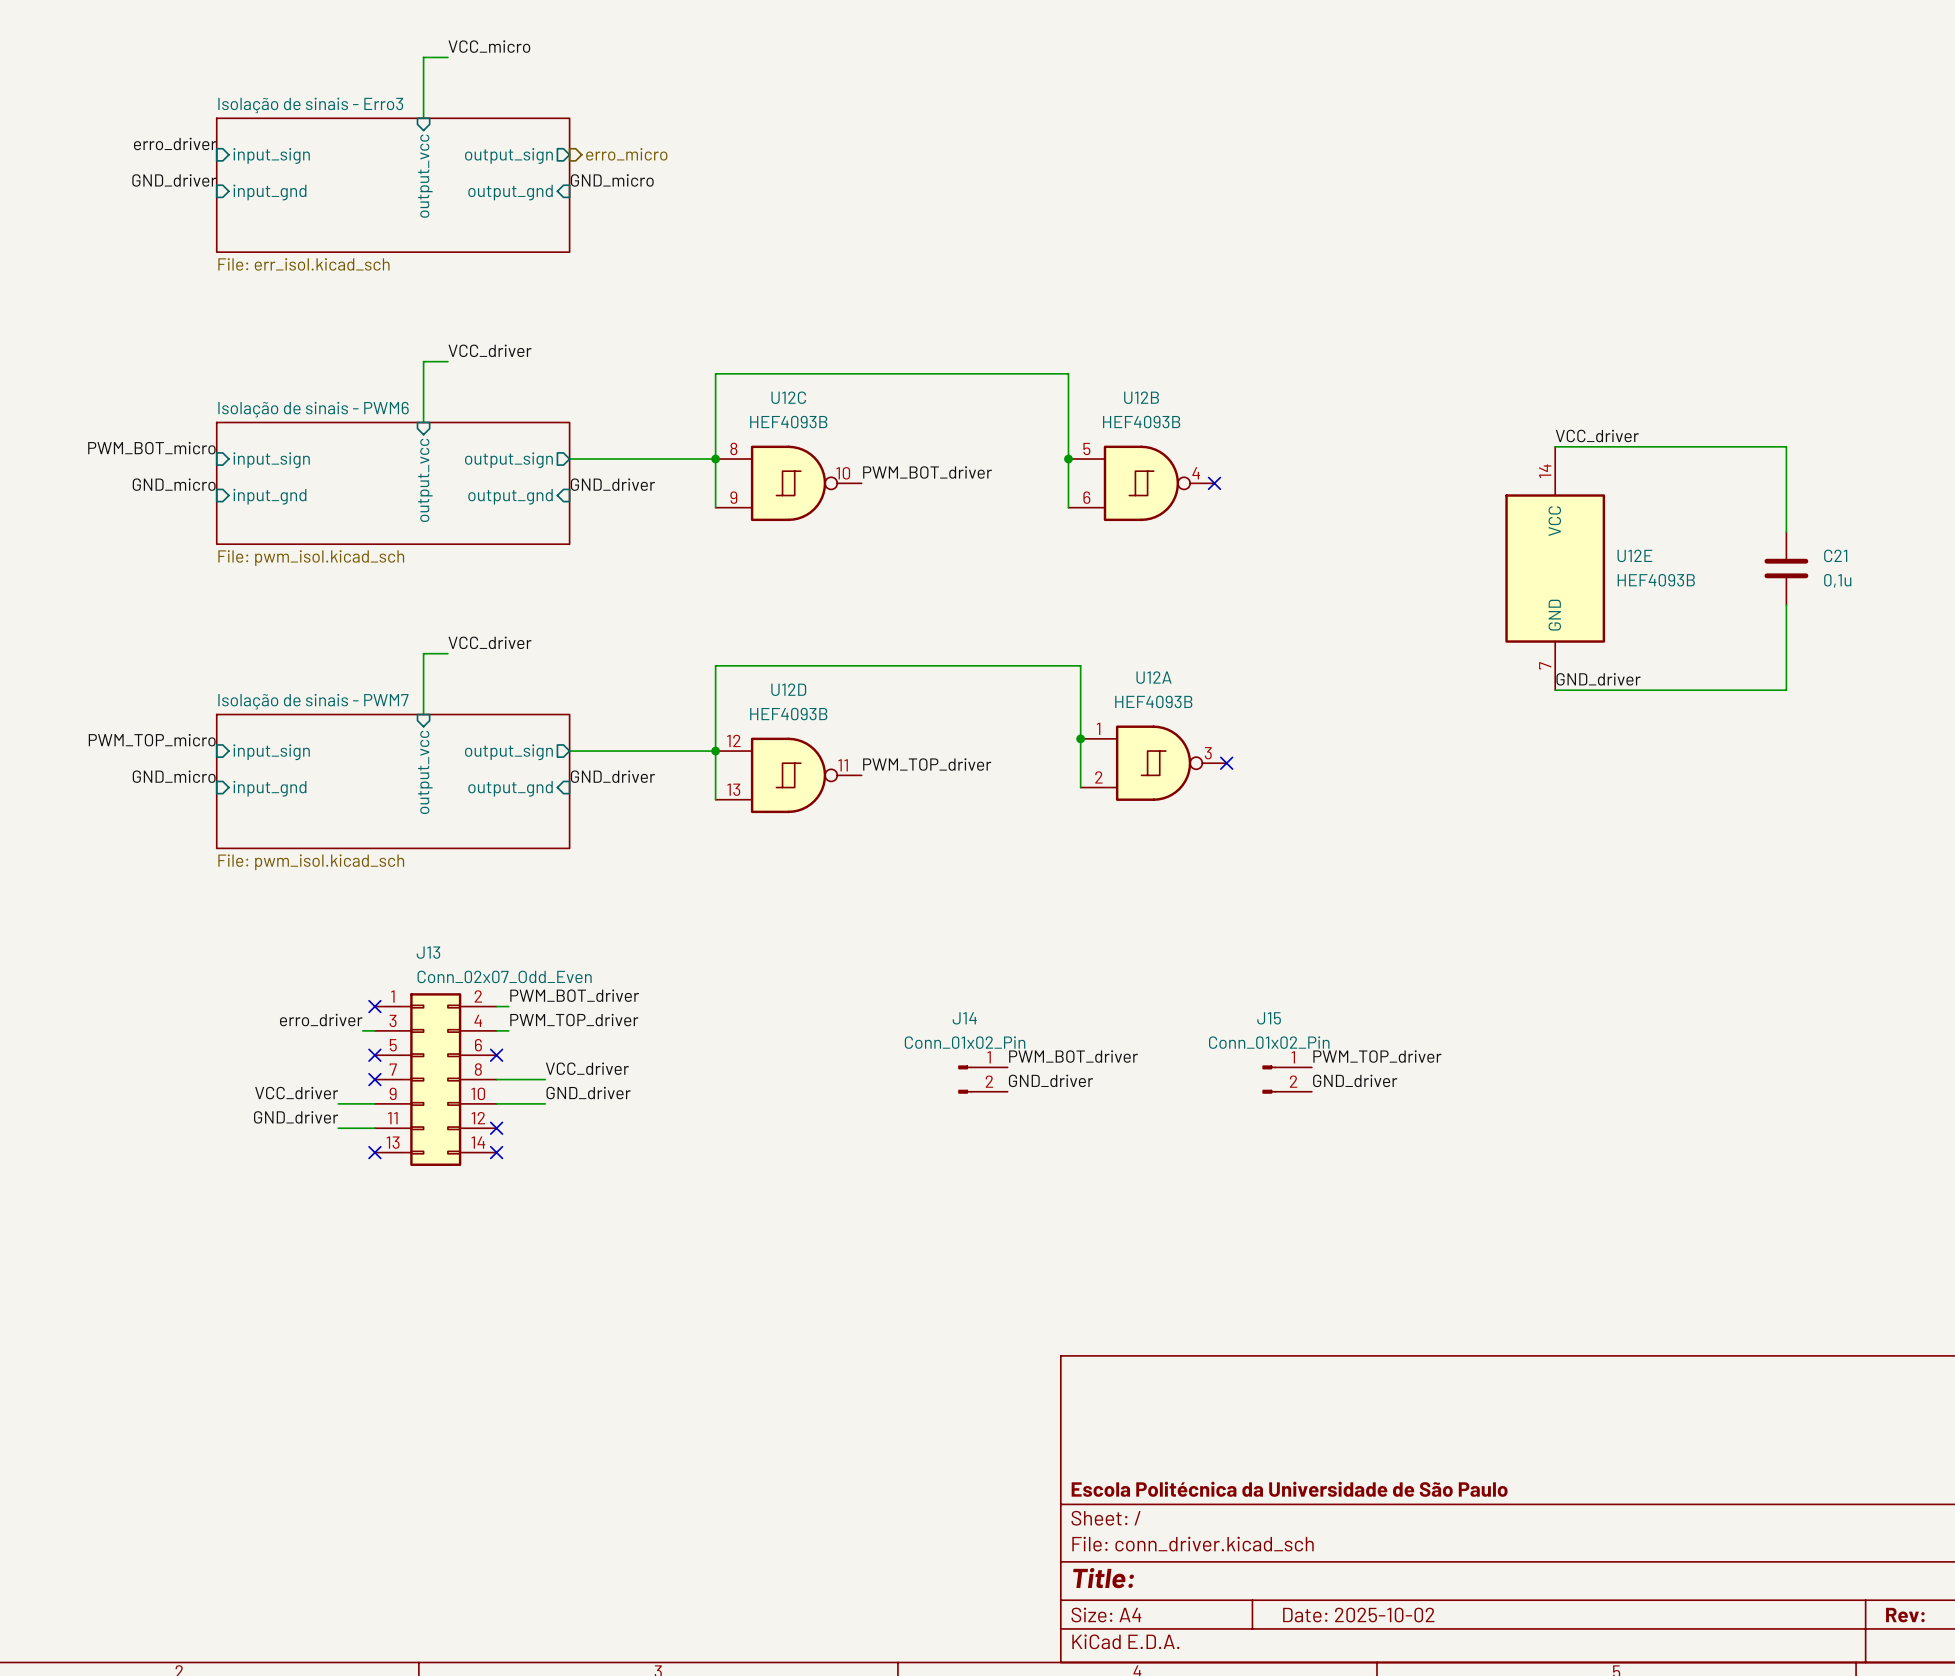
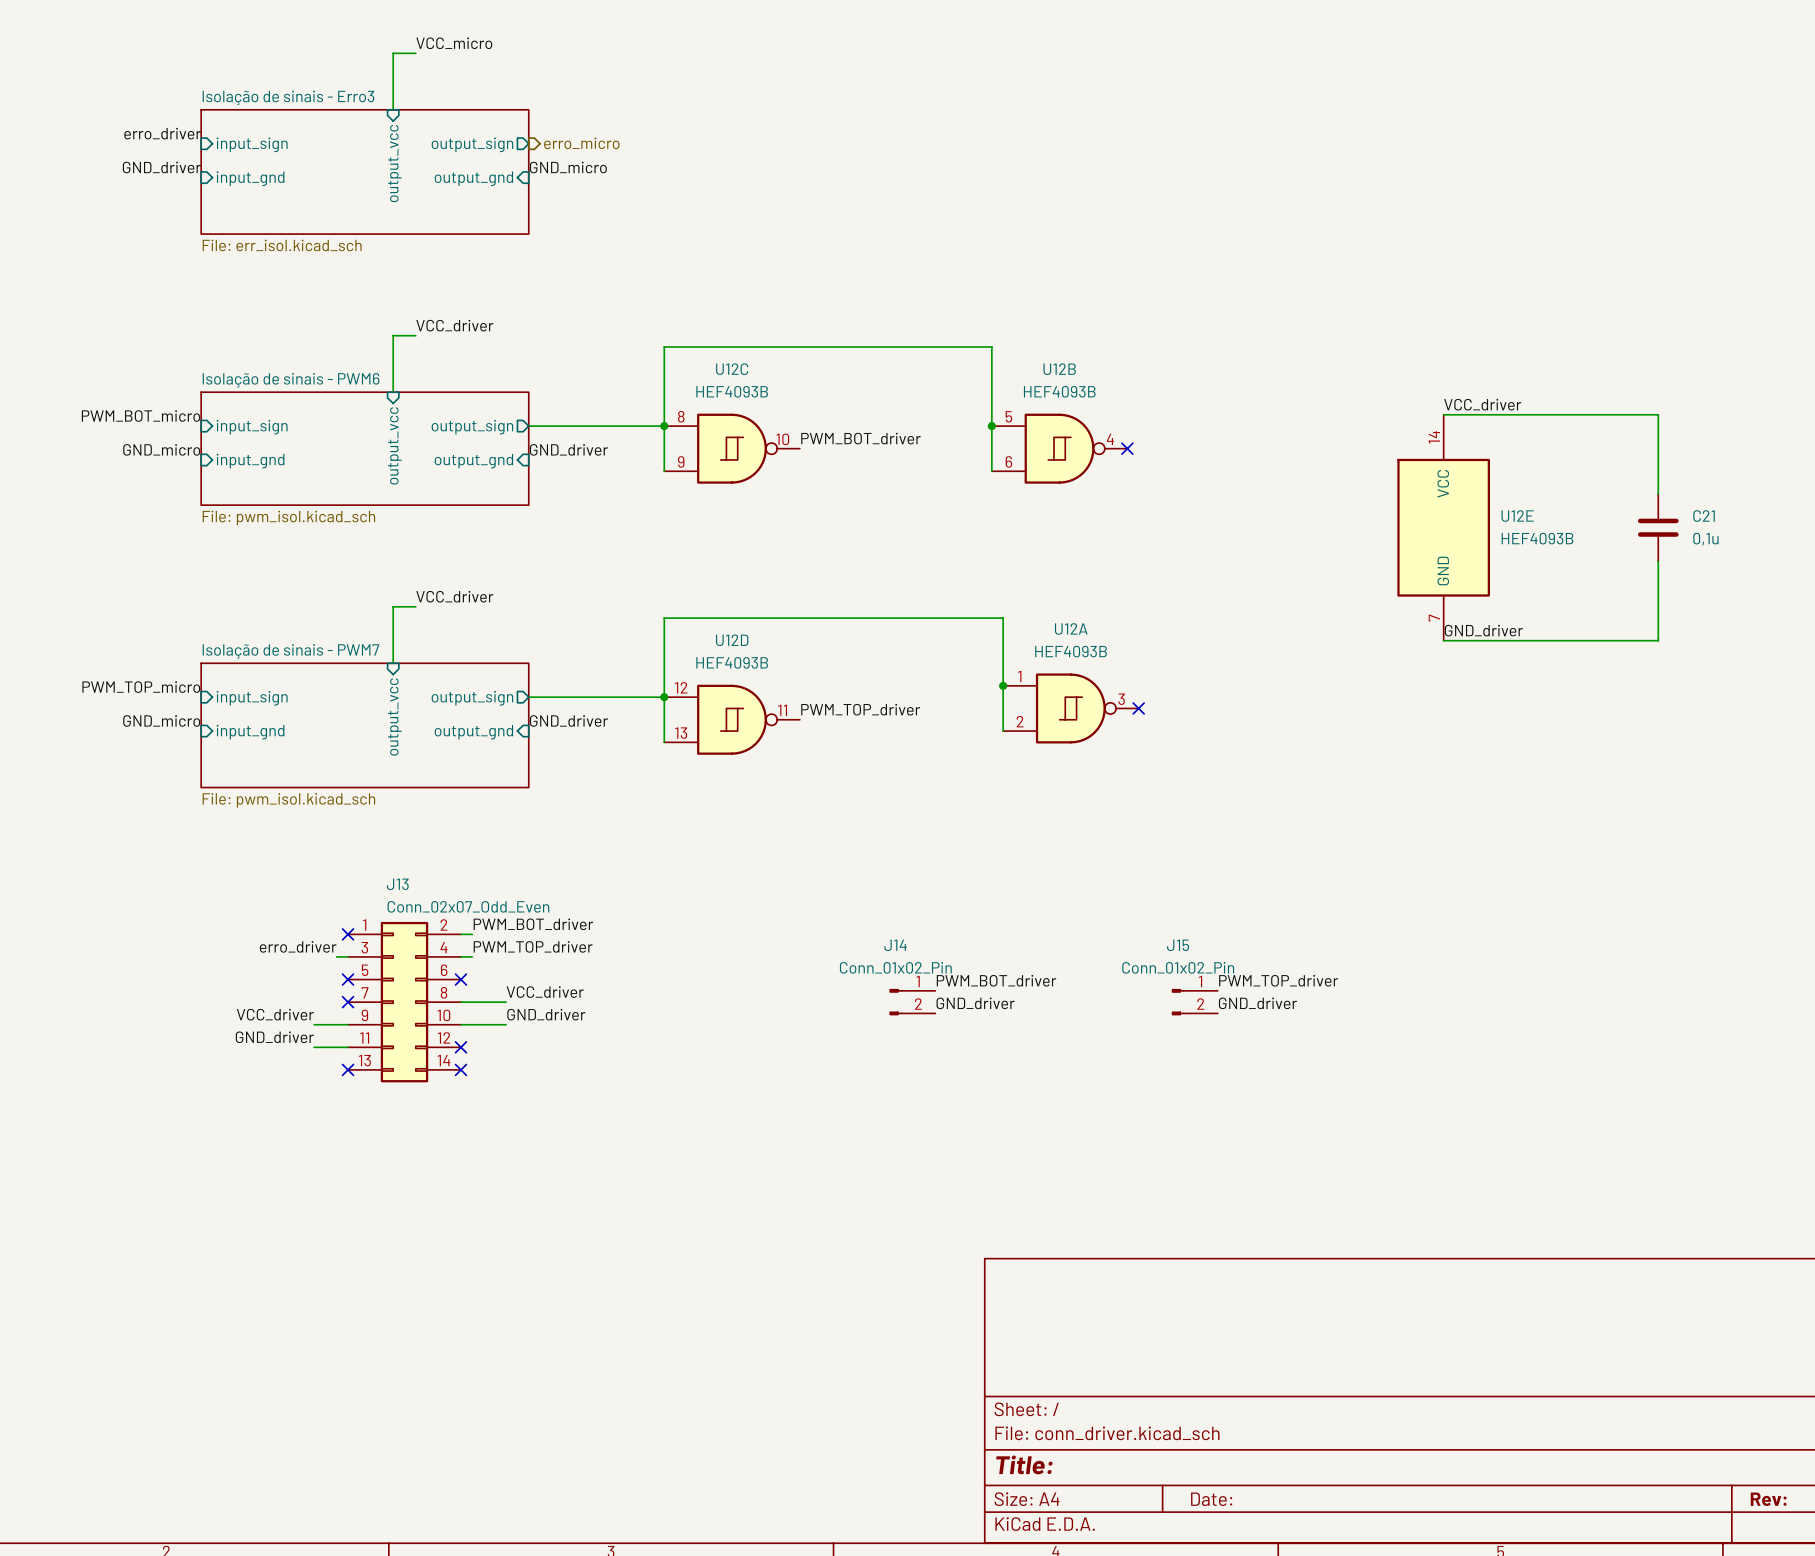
title block: Escola Politécnica da Universidade de São Paulo (1289, 1489) -> none
title block: Date: 2025-10-02 (1358, 1615) -> Date: (1211, 1499)

